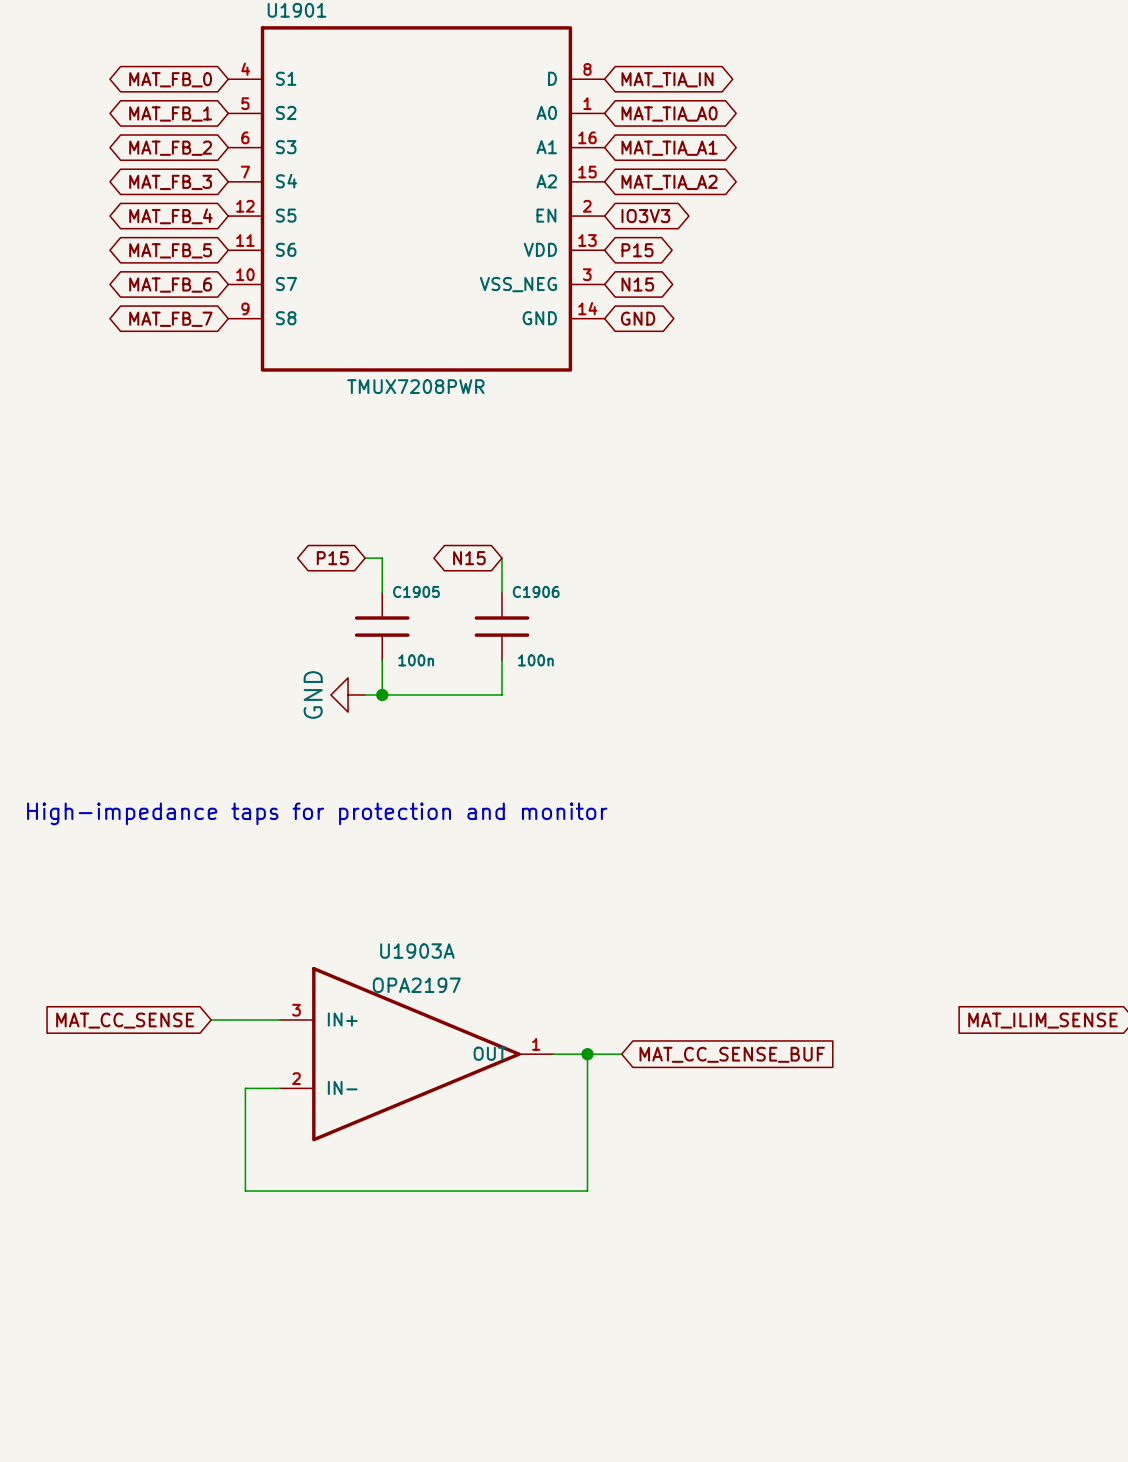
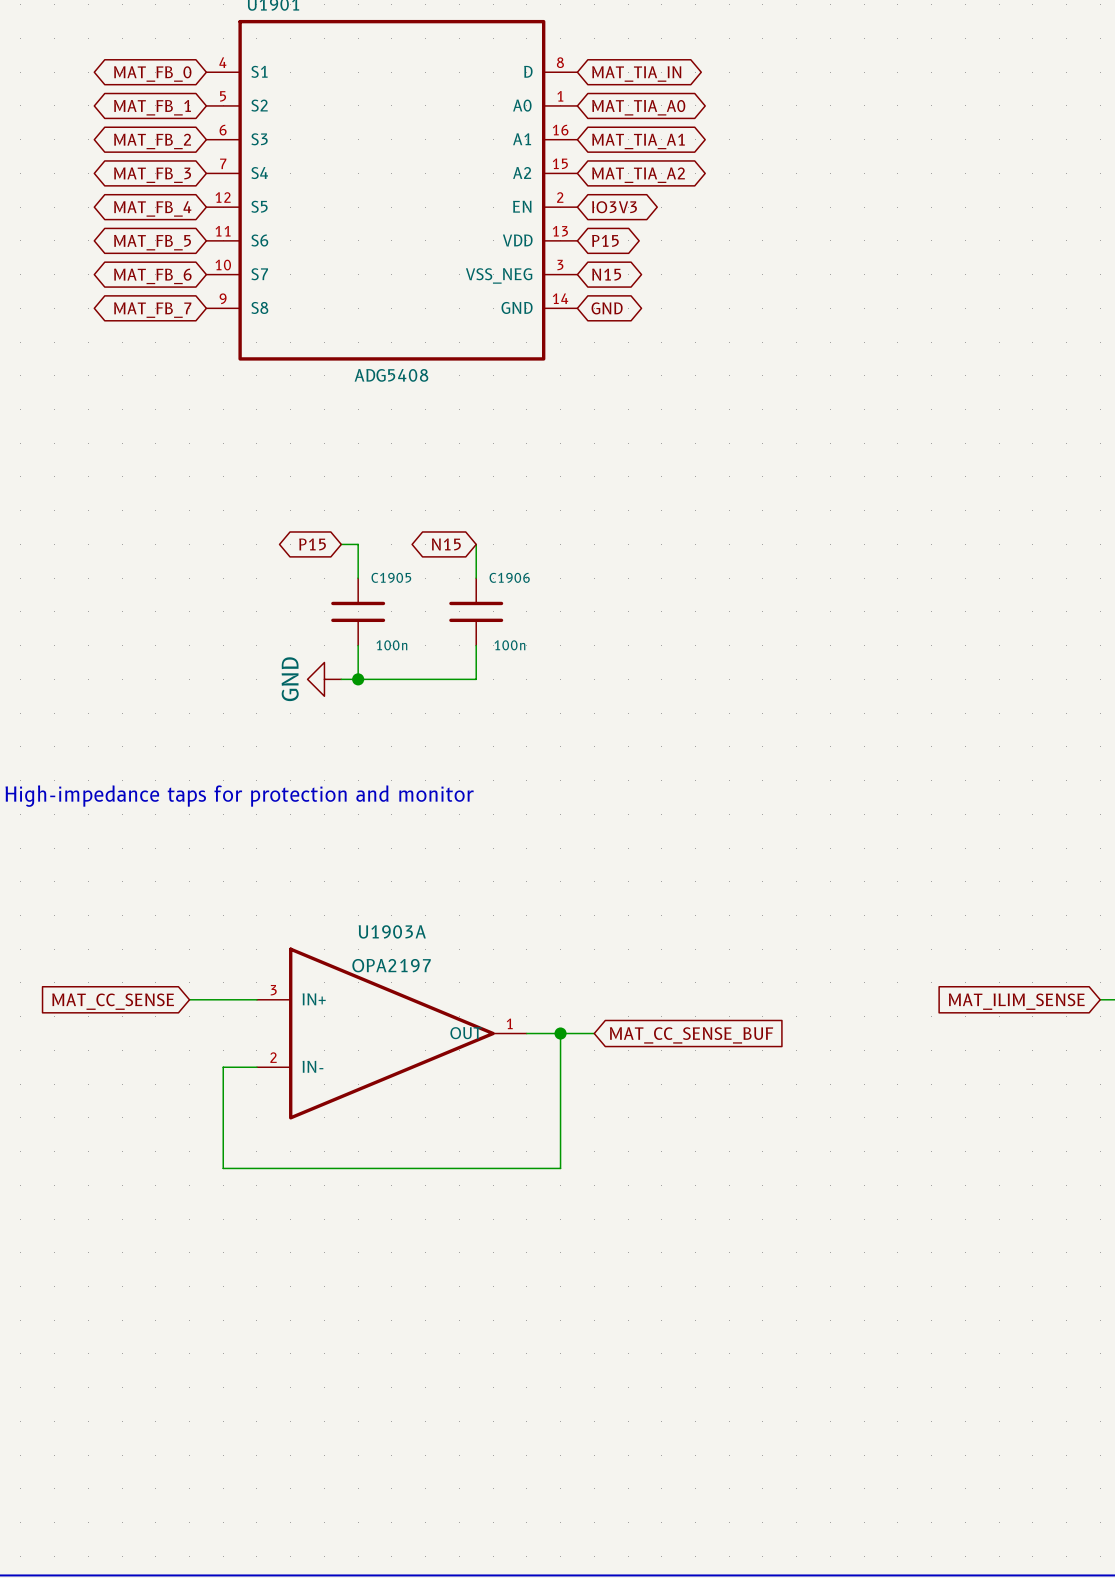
U1901 value: TMUX7208PWR (415, 386) -> ADG5408 (391, 375)

